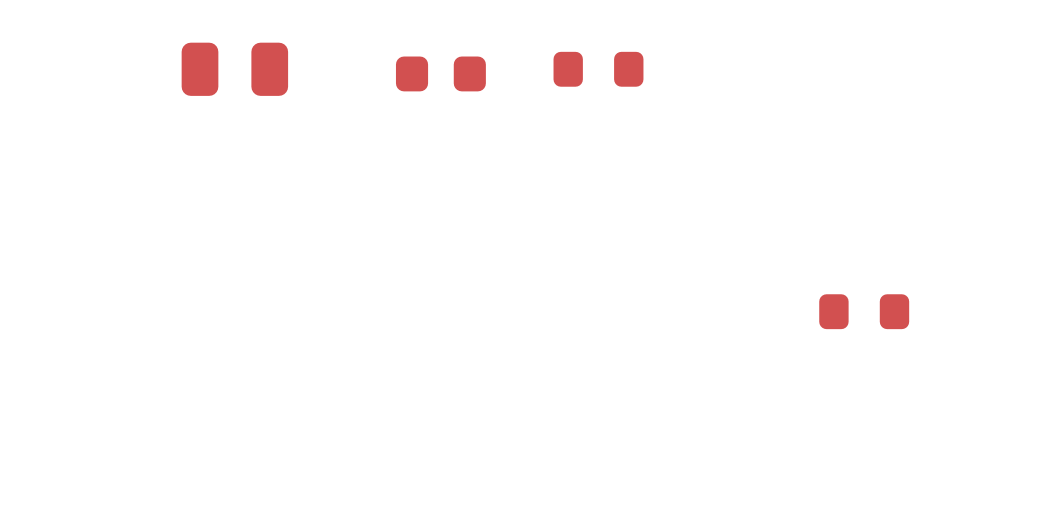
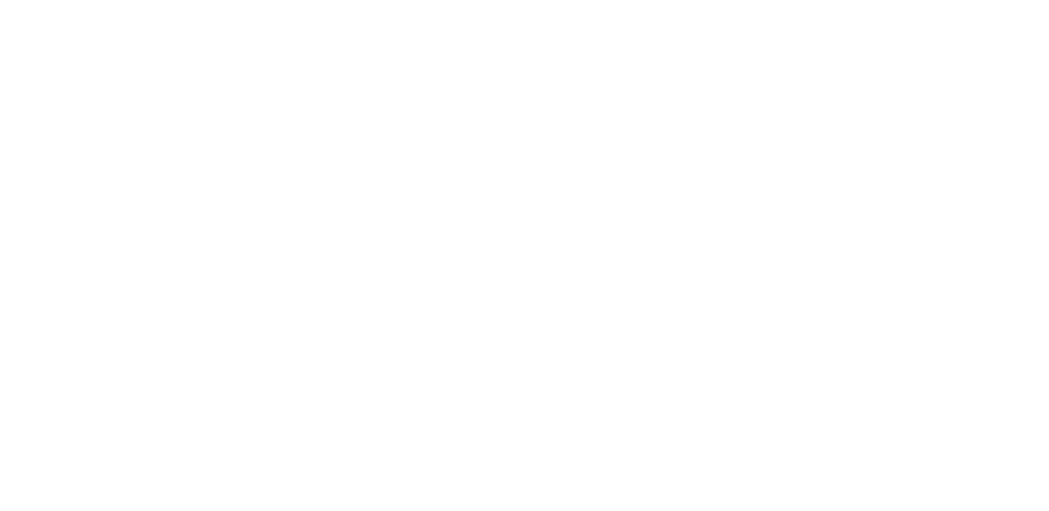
part: (234, 69) -> none
part: (598, 69) -> none
part: (440, 73) -> none
part: (864, 311) -> none

